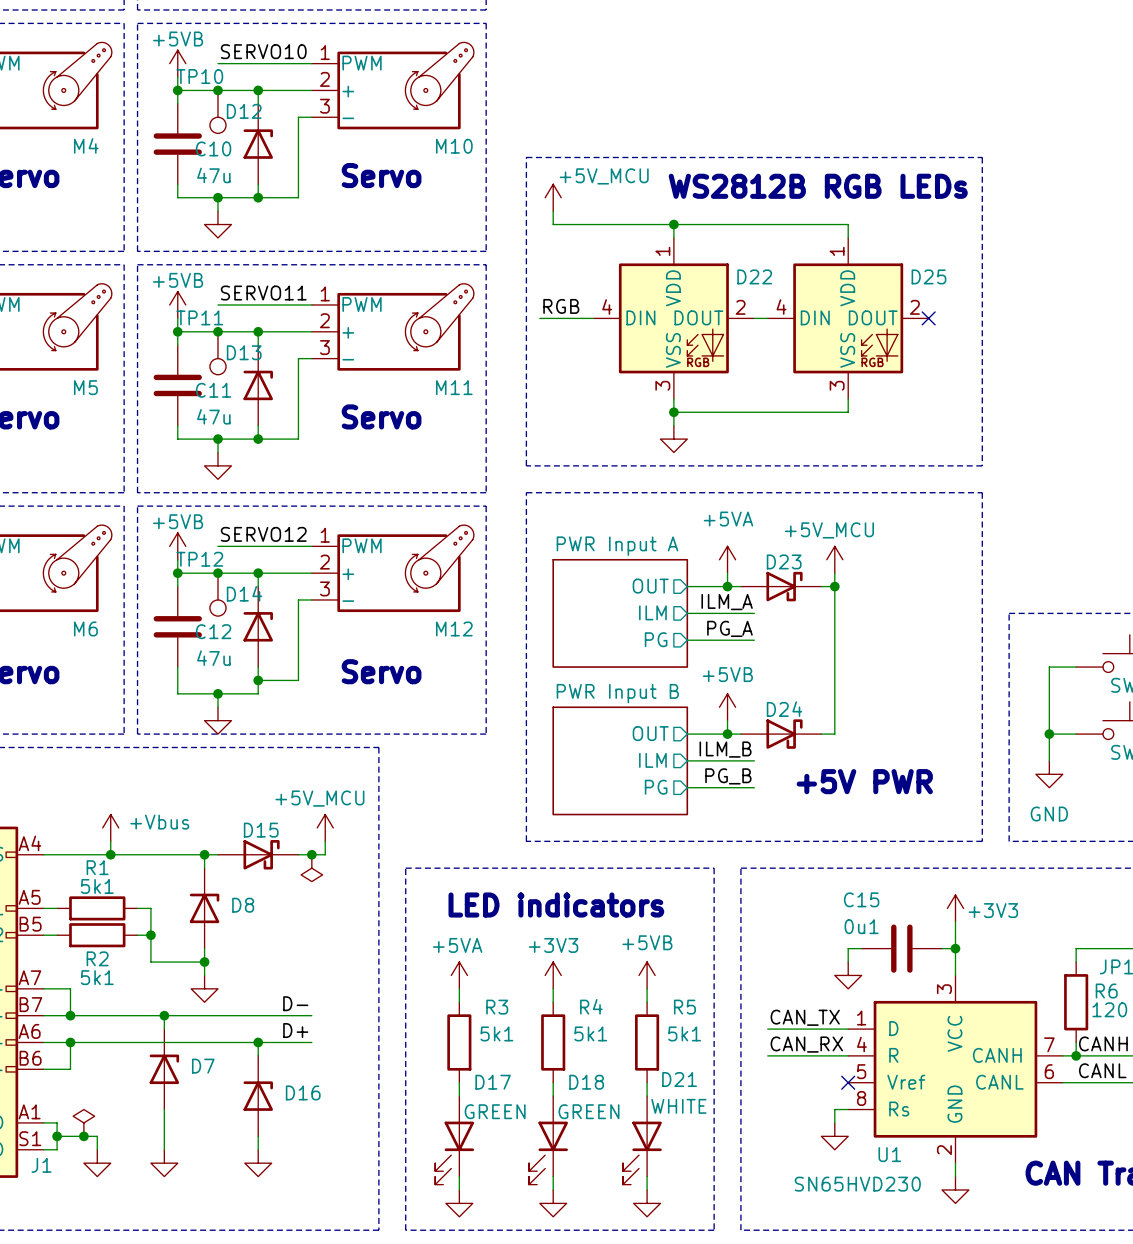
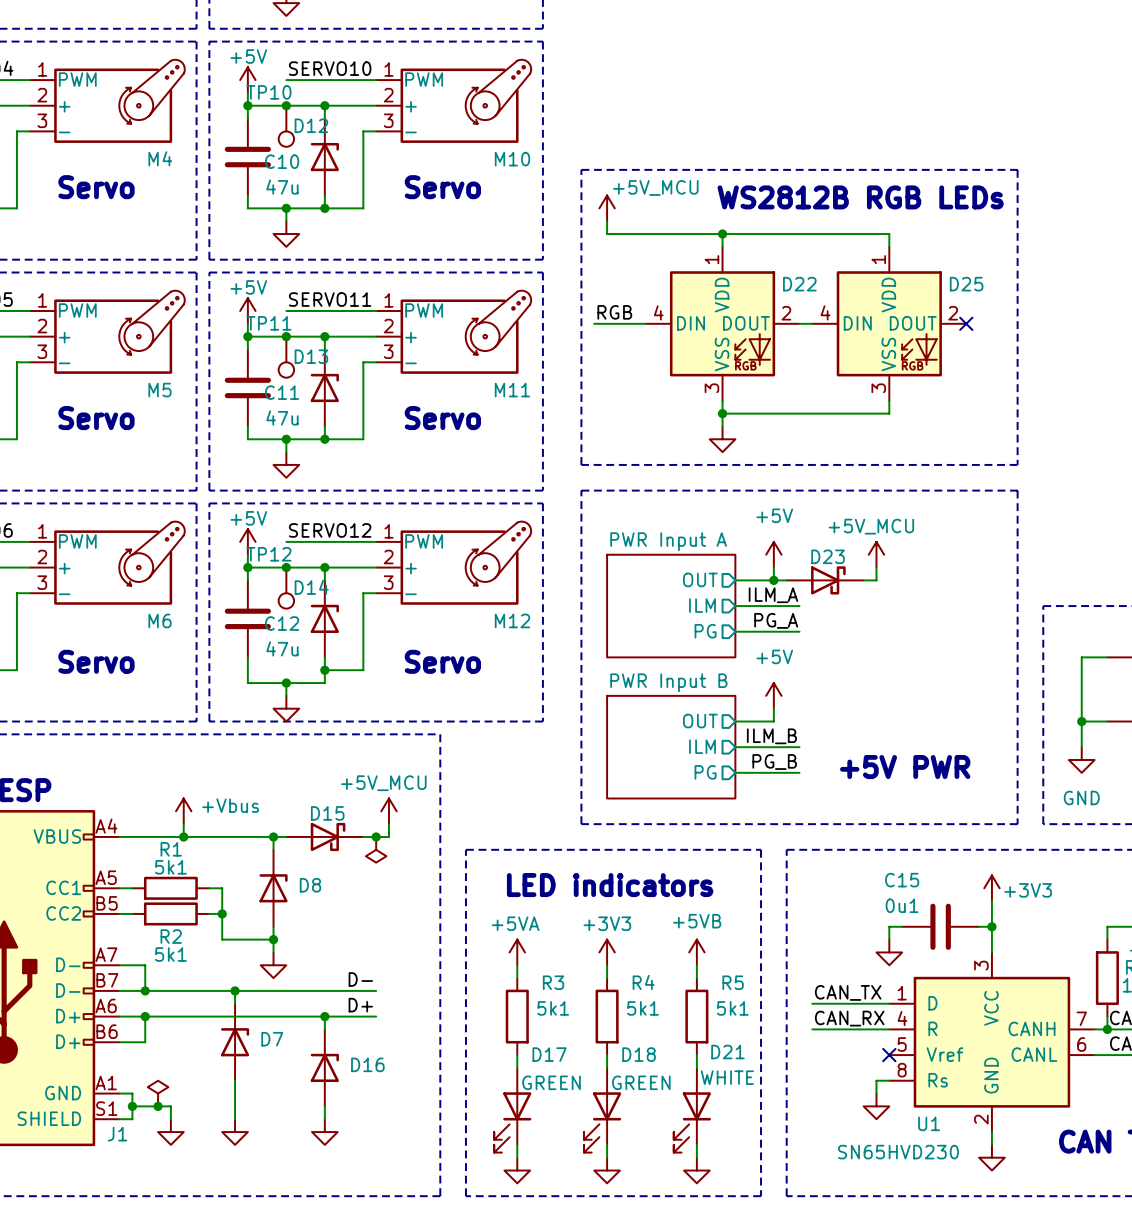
power symbol: +5VB (177, 63) -> +5V (247, 80)
power symbol: +5VB (177, 304) -> +5V (247, 310)
power symbol: +5VB (177, 546) -> +5V (247, 541)
power symbol: +5VA (727, 559) -> +5V (773, 554)
wire: (834, 586) (834, 734) (821, 734) -> none
junction: (834, 586) -> none
power symbol: +5VB (727, 707) -> +5V (773, 695)
wire: (727, 734) (740, 734) -> none
junction: (727, 734) -> none
D24: (781, 734) -> none

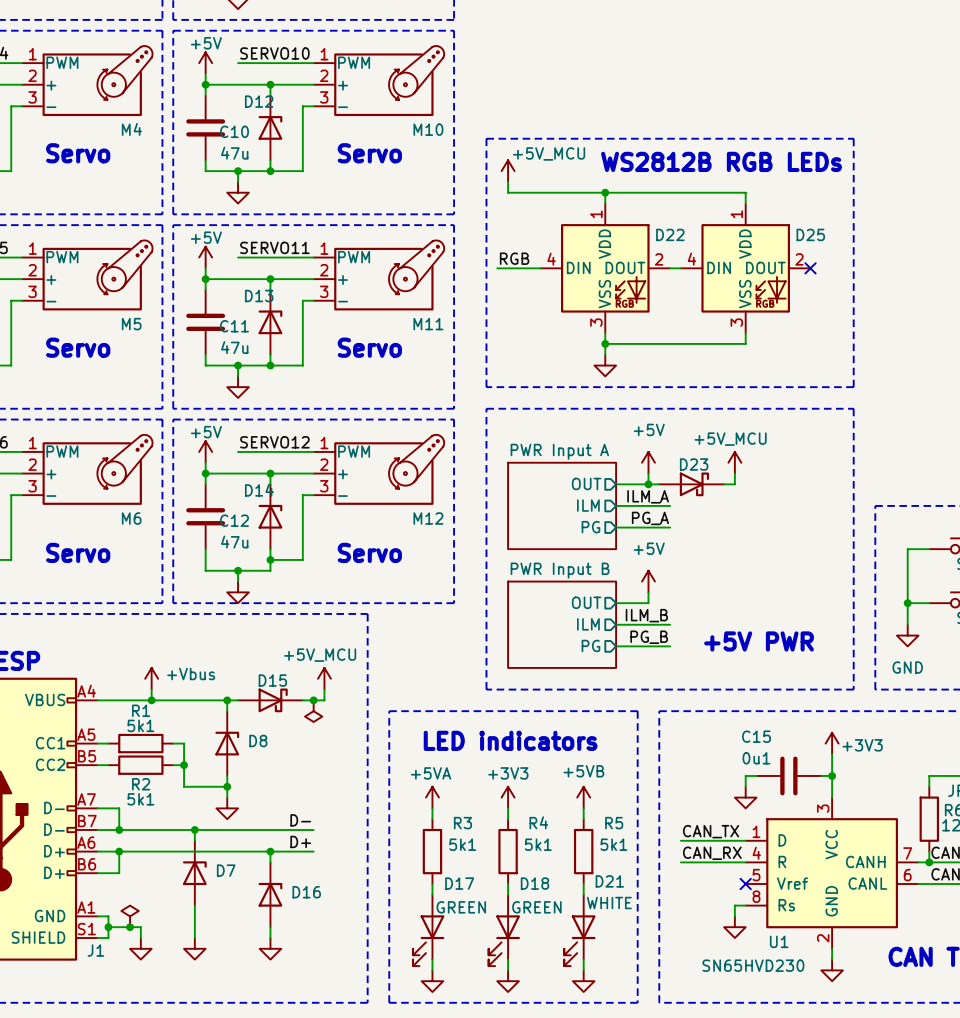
junction: (286, 105) -> none
TP10: (286, 126) -> none
junction: (286, 336) -> none
TP11: (286, 357) -> none
junction: (286, 567) -> none
TP12: (286, 588) -> none

